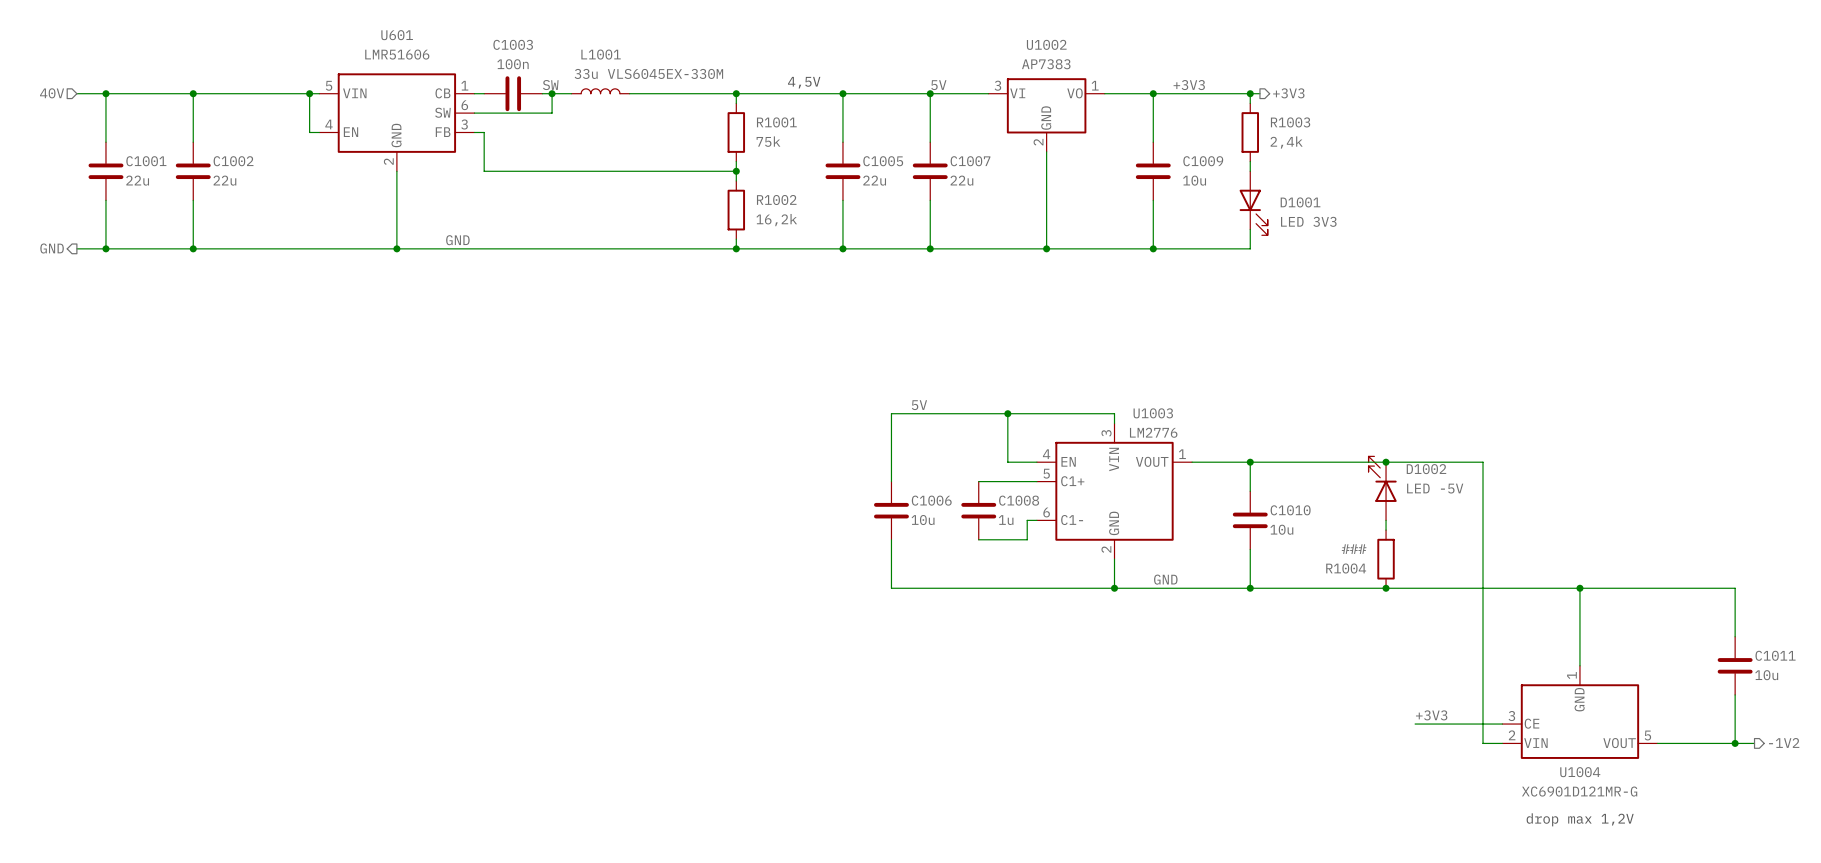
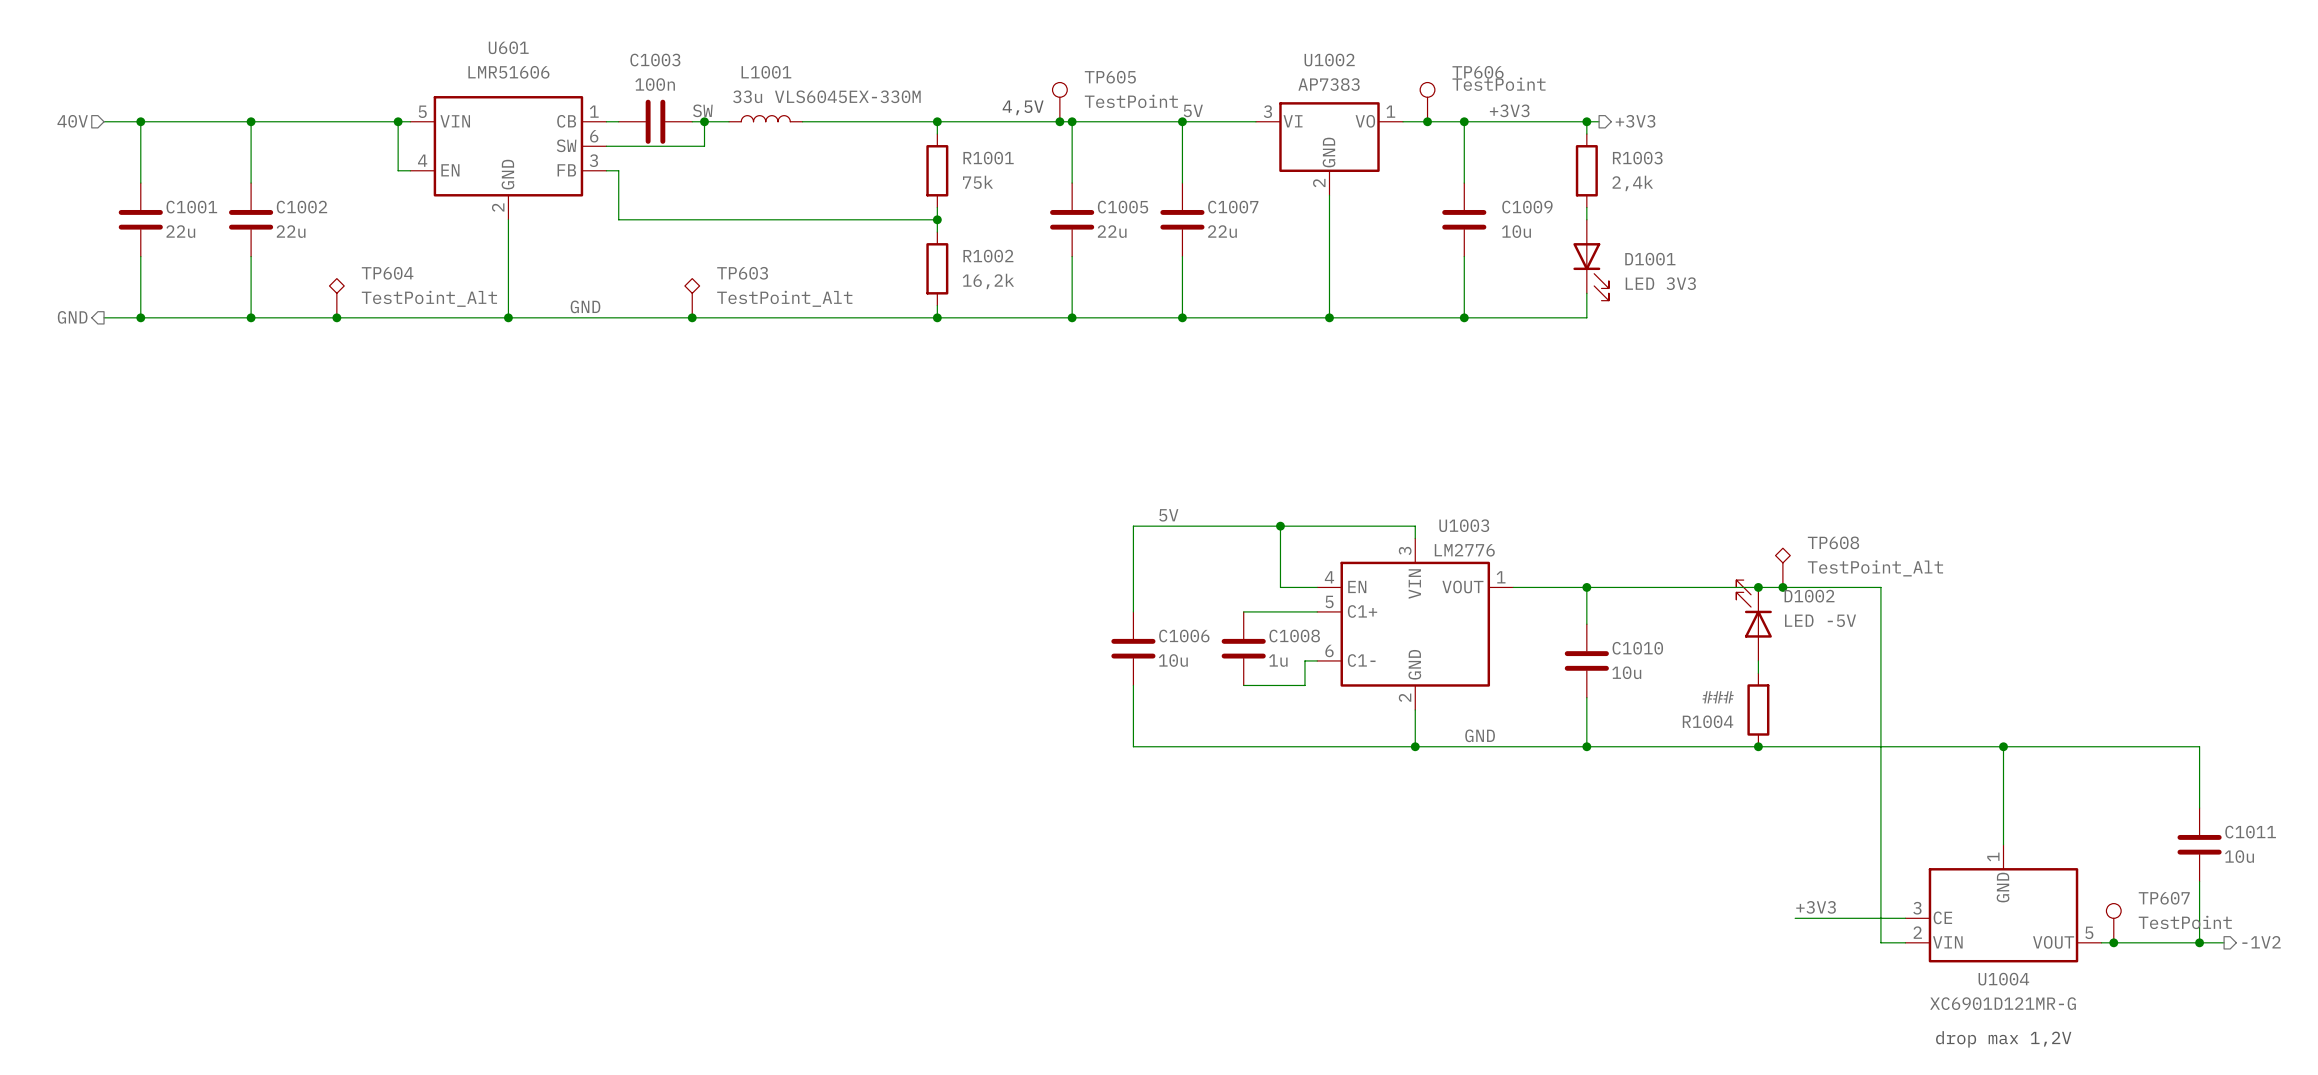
TP605: none -> TestPoint (1059, 102)
TP606: none -> TestPoint (1427, 102)
junction: none -> (1059, 121)
junction: none -> (1427, 121)
TP604: none -> TestPoint_Alt (336, 298)
TP603: none -> TestPoint_Alt (692, 298)
junction: none -> (336, 317)
junction: none -> (692, 317)
TP608: none -> TestPoint_Alt (1782, 567)
junction: none -> (1782, 587)
TP607: none -> TestPoint (2113, 923)
junction: none -> (2113, 942)

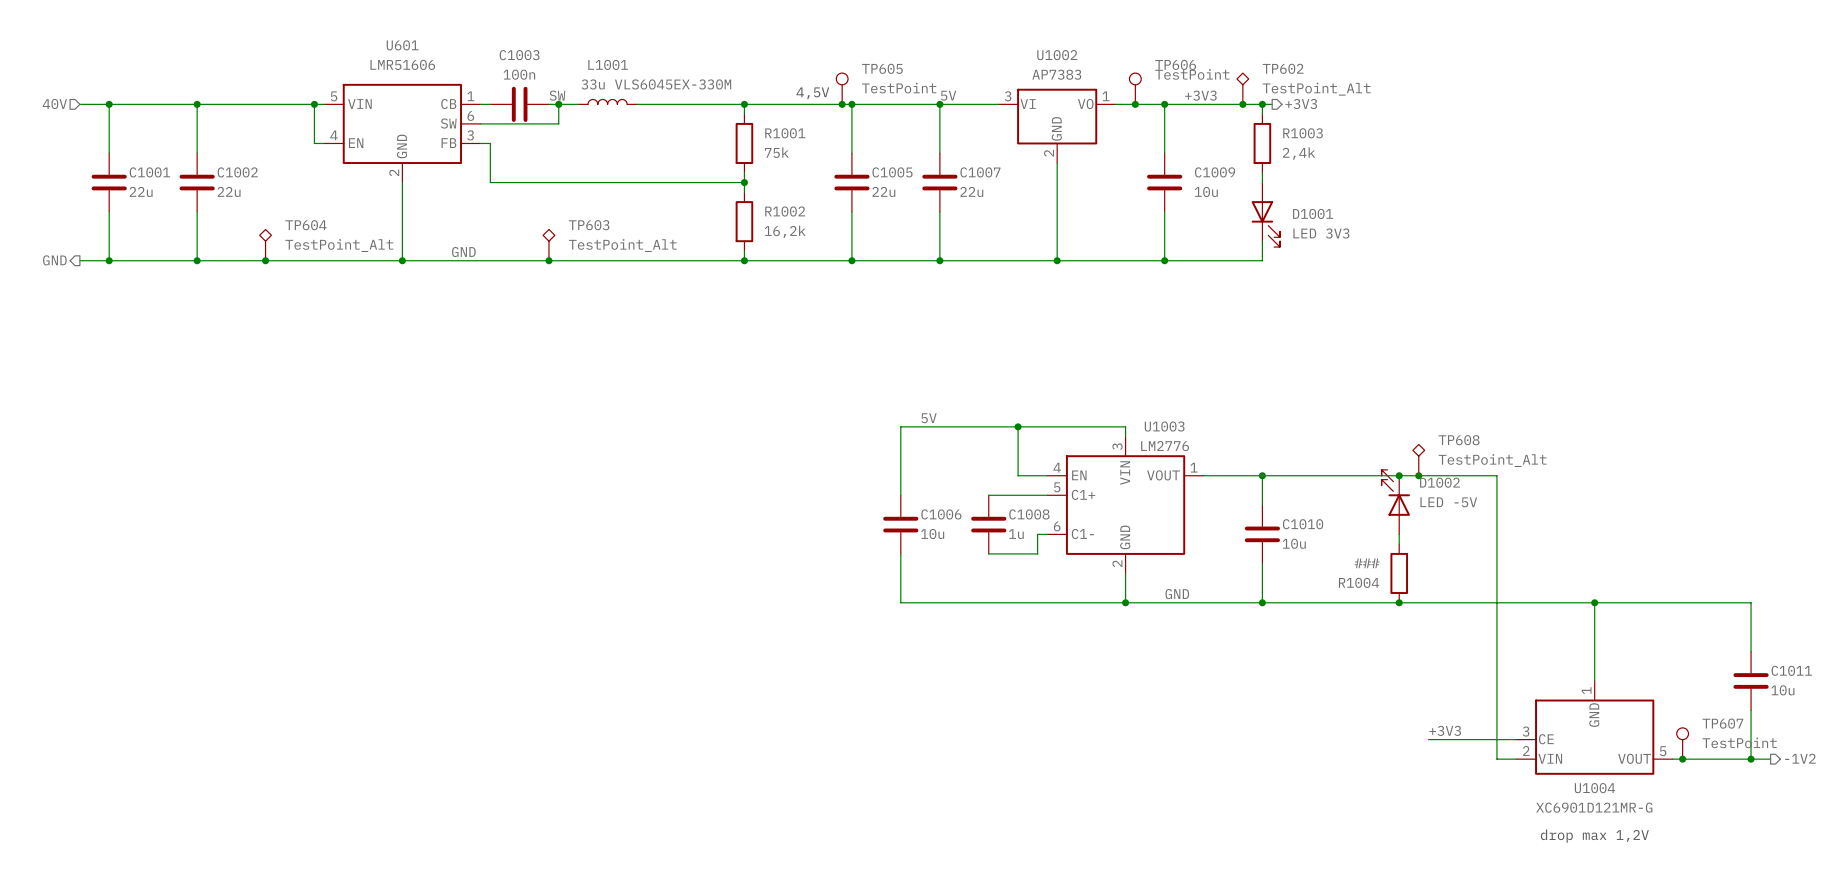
TP602: none -> TestPoint_Alt (1242, 88)
junction: none -> (1242, 104)

